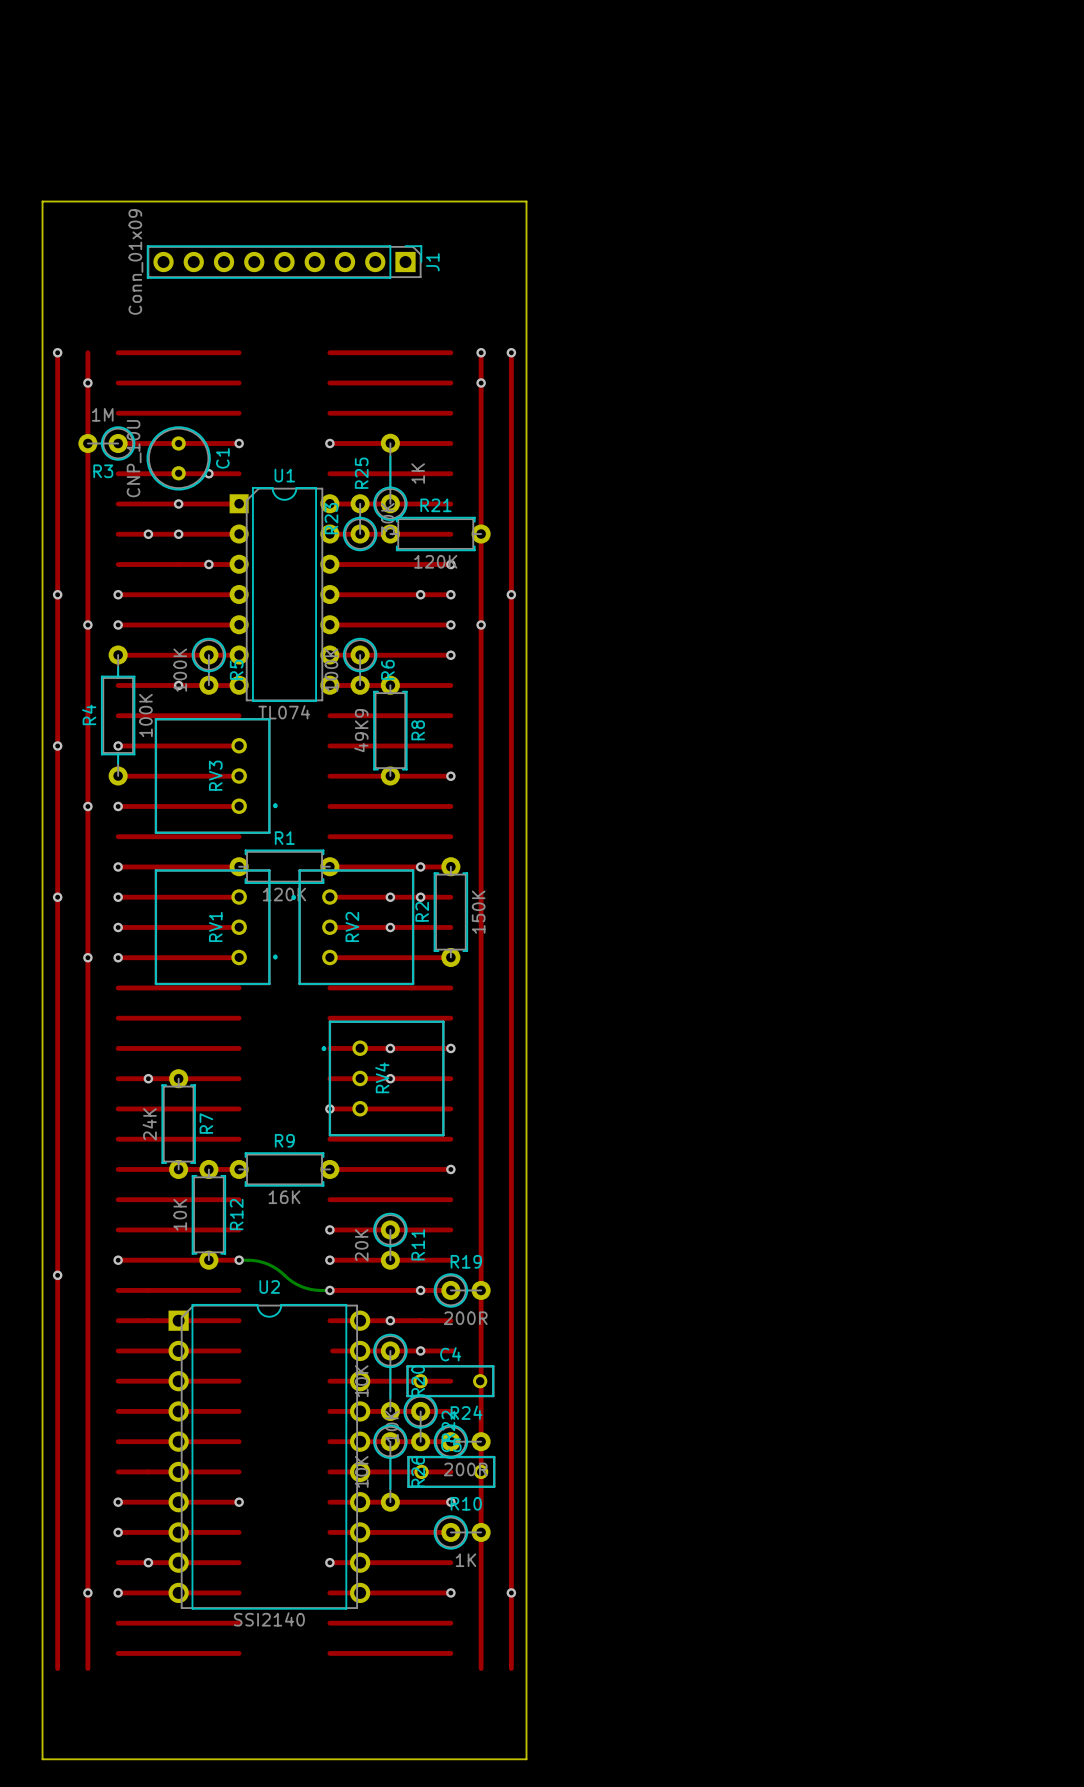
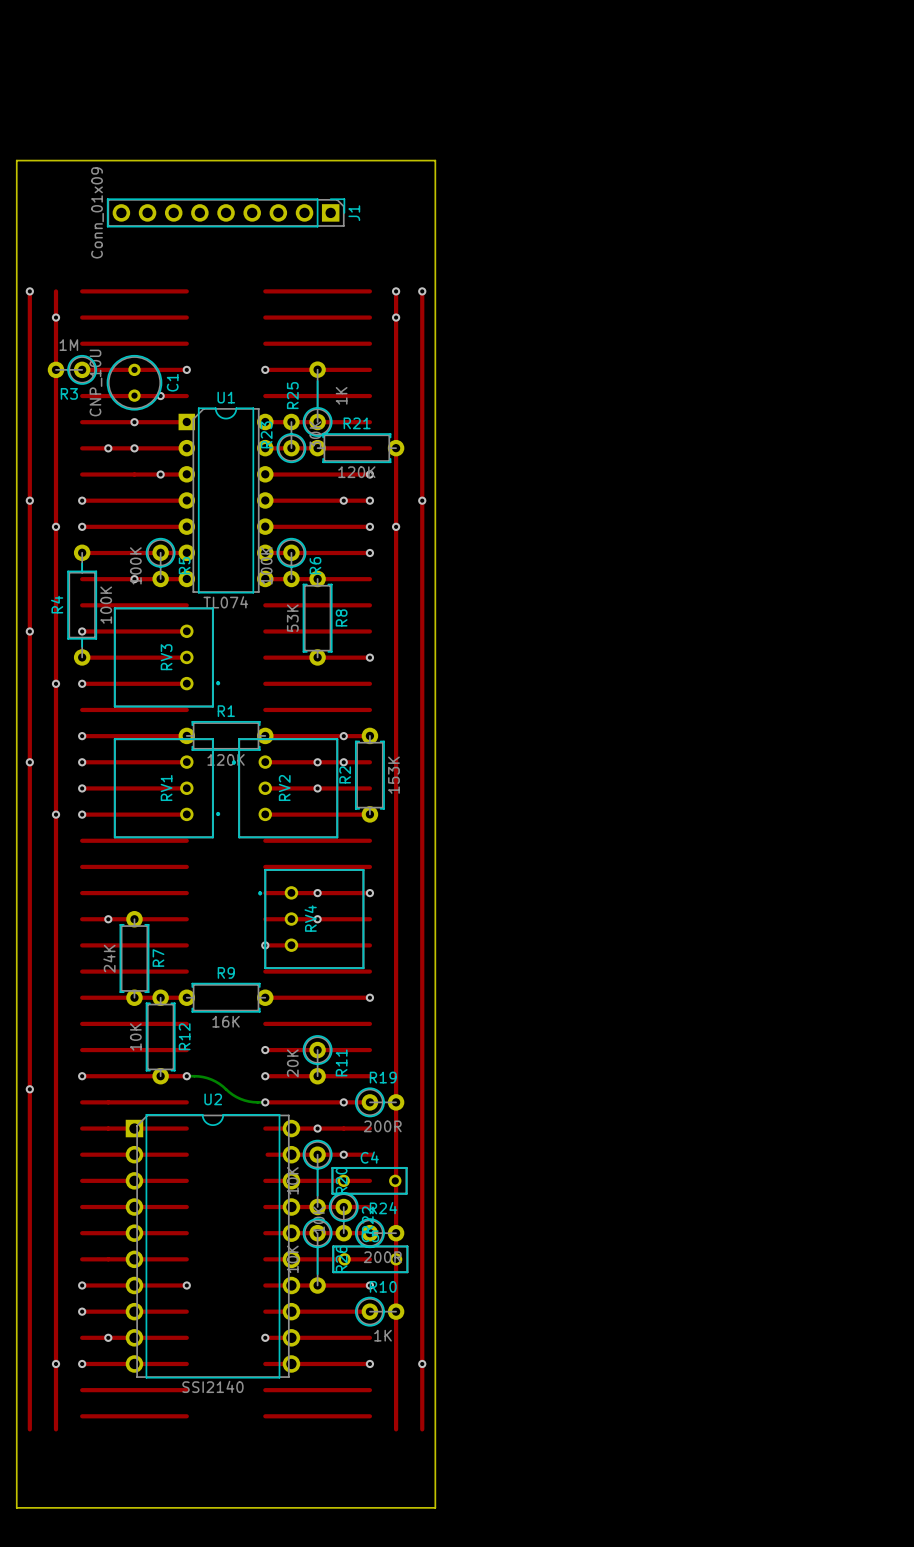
R8 value: 49K9 (361, 730) -> 53K (292, 618)
R2 value: 150K (478, 912) -> 153K (393, 775)

